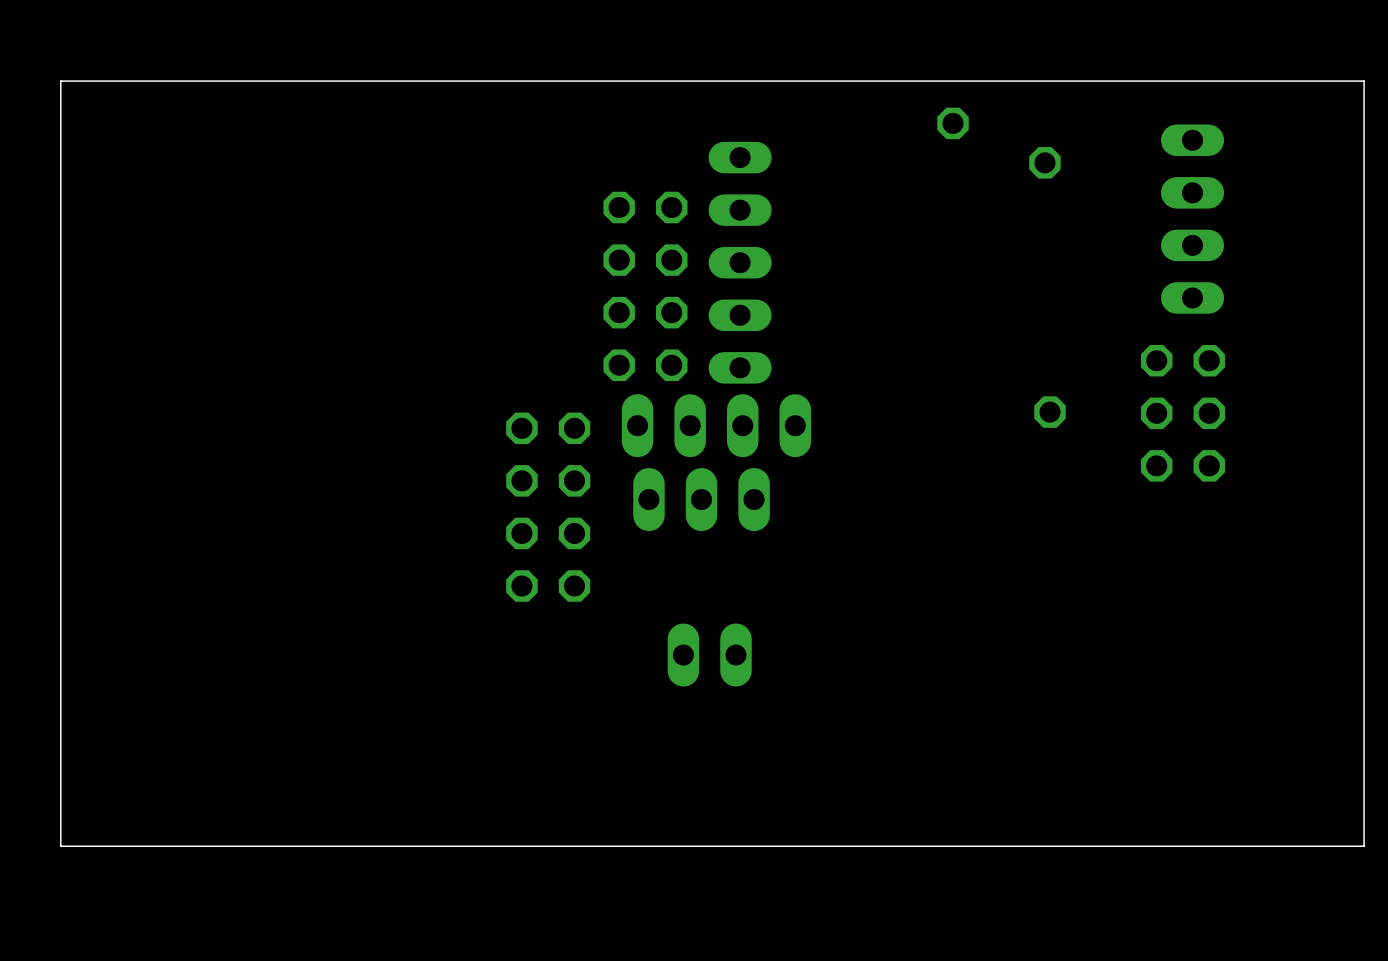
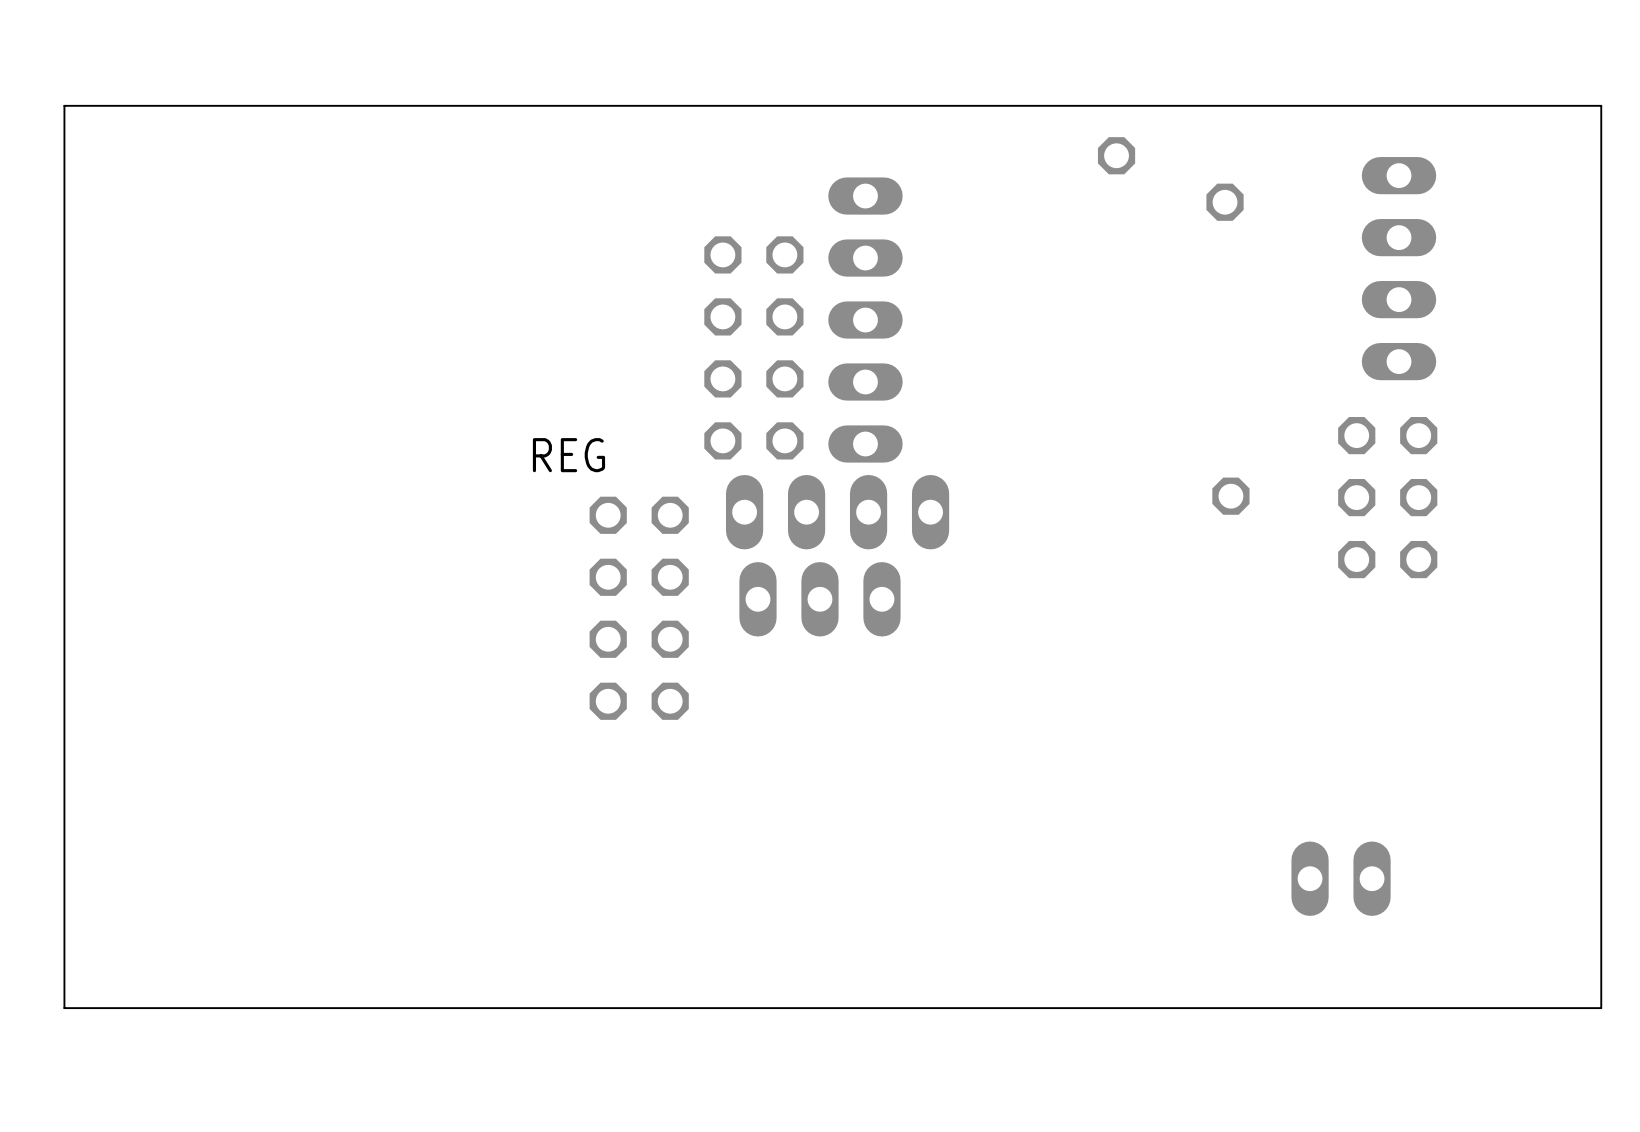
REG name: none -> REG (568, 455)
part position: (709, 655) -> (1341, 878)

